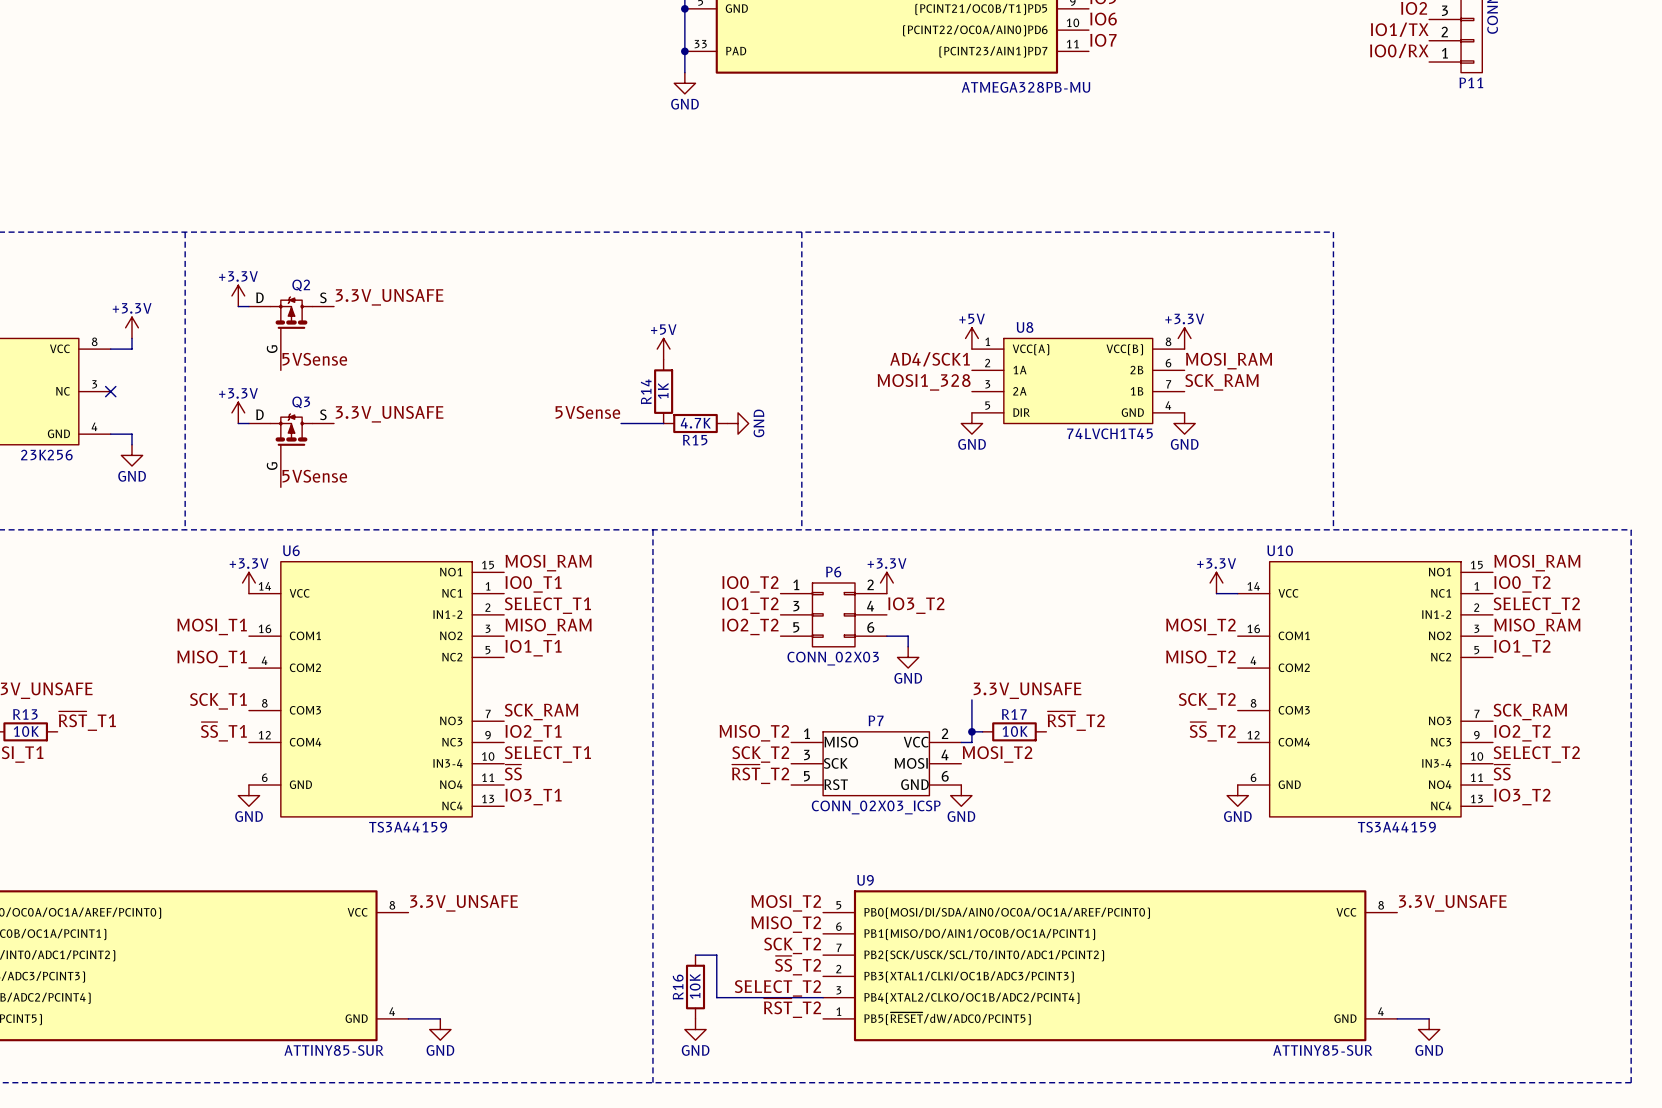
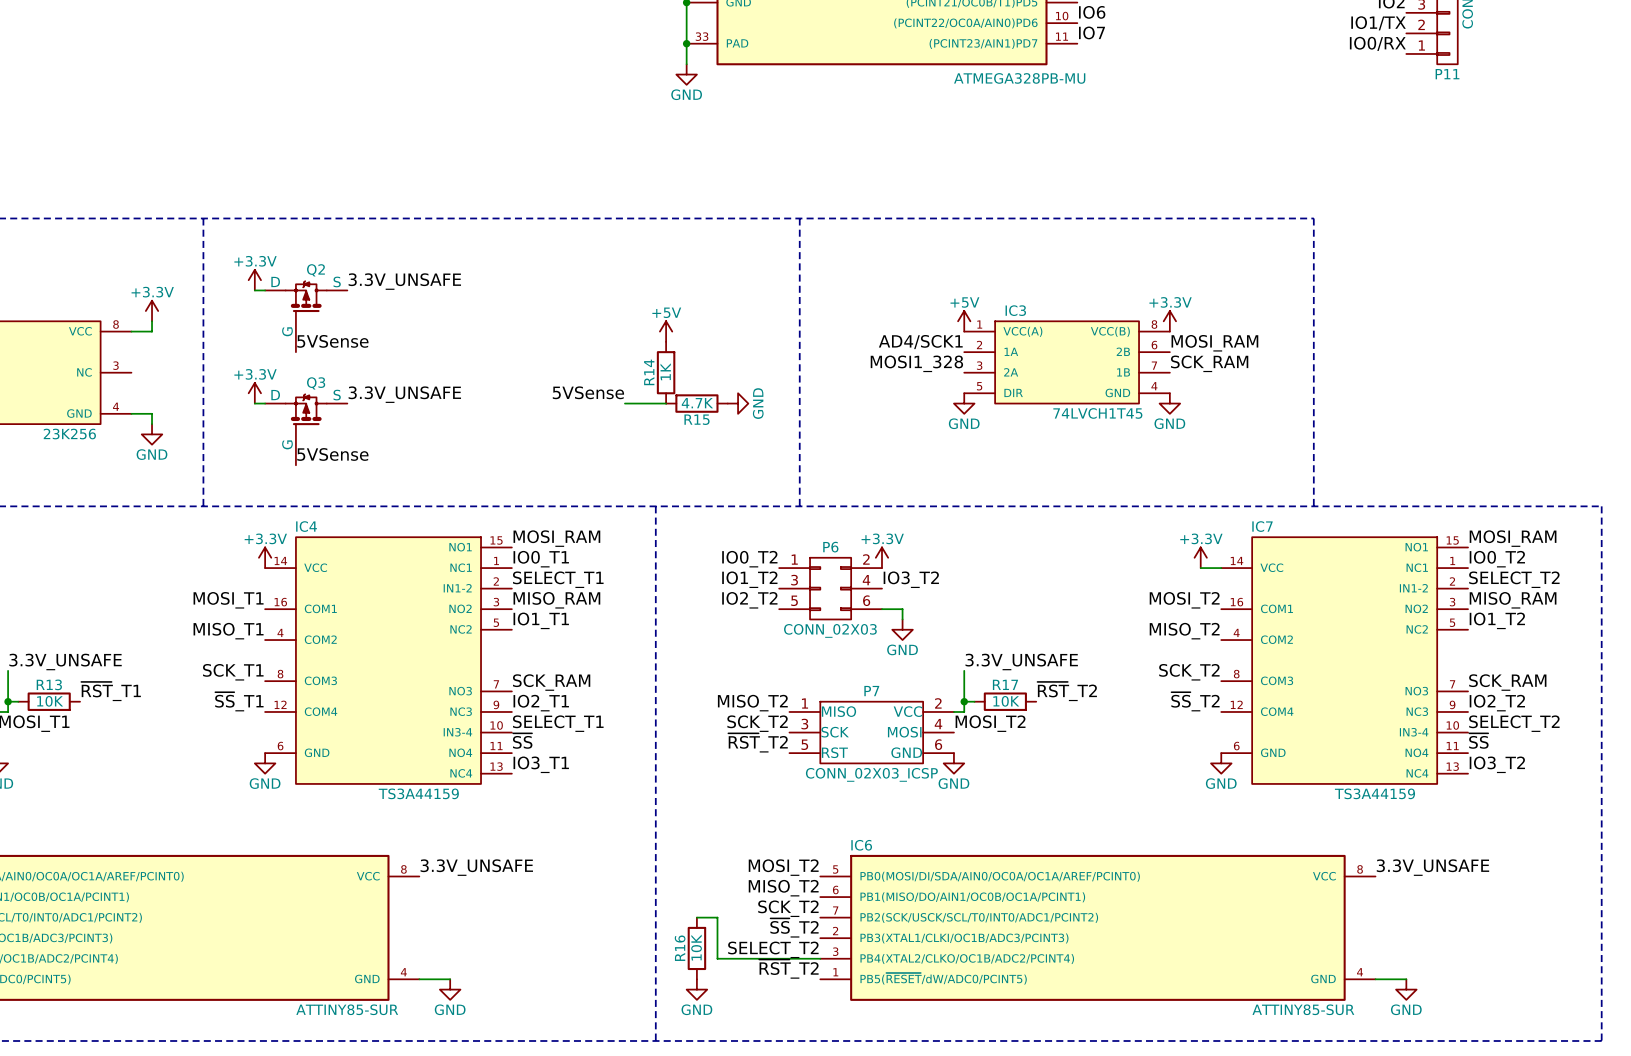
U8 name: U8 (1025, 327) -> IC3 (1015, 310)
no-connect mark: (110, 391) -> none
U6 name: U6 (291, 550) -> IC4 (306, 526)
U10 name: U10 (1280, 550) -> IC7 (1262, 526)
U9 name: U9 (865, 880) -> IC6 (861, 845)

